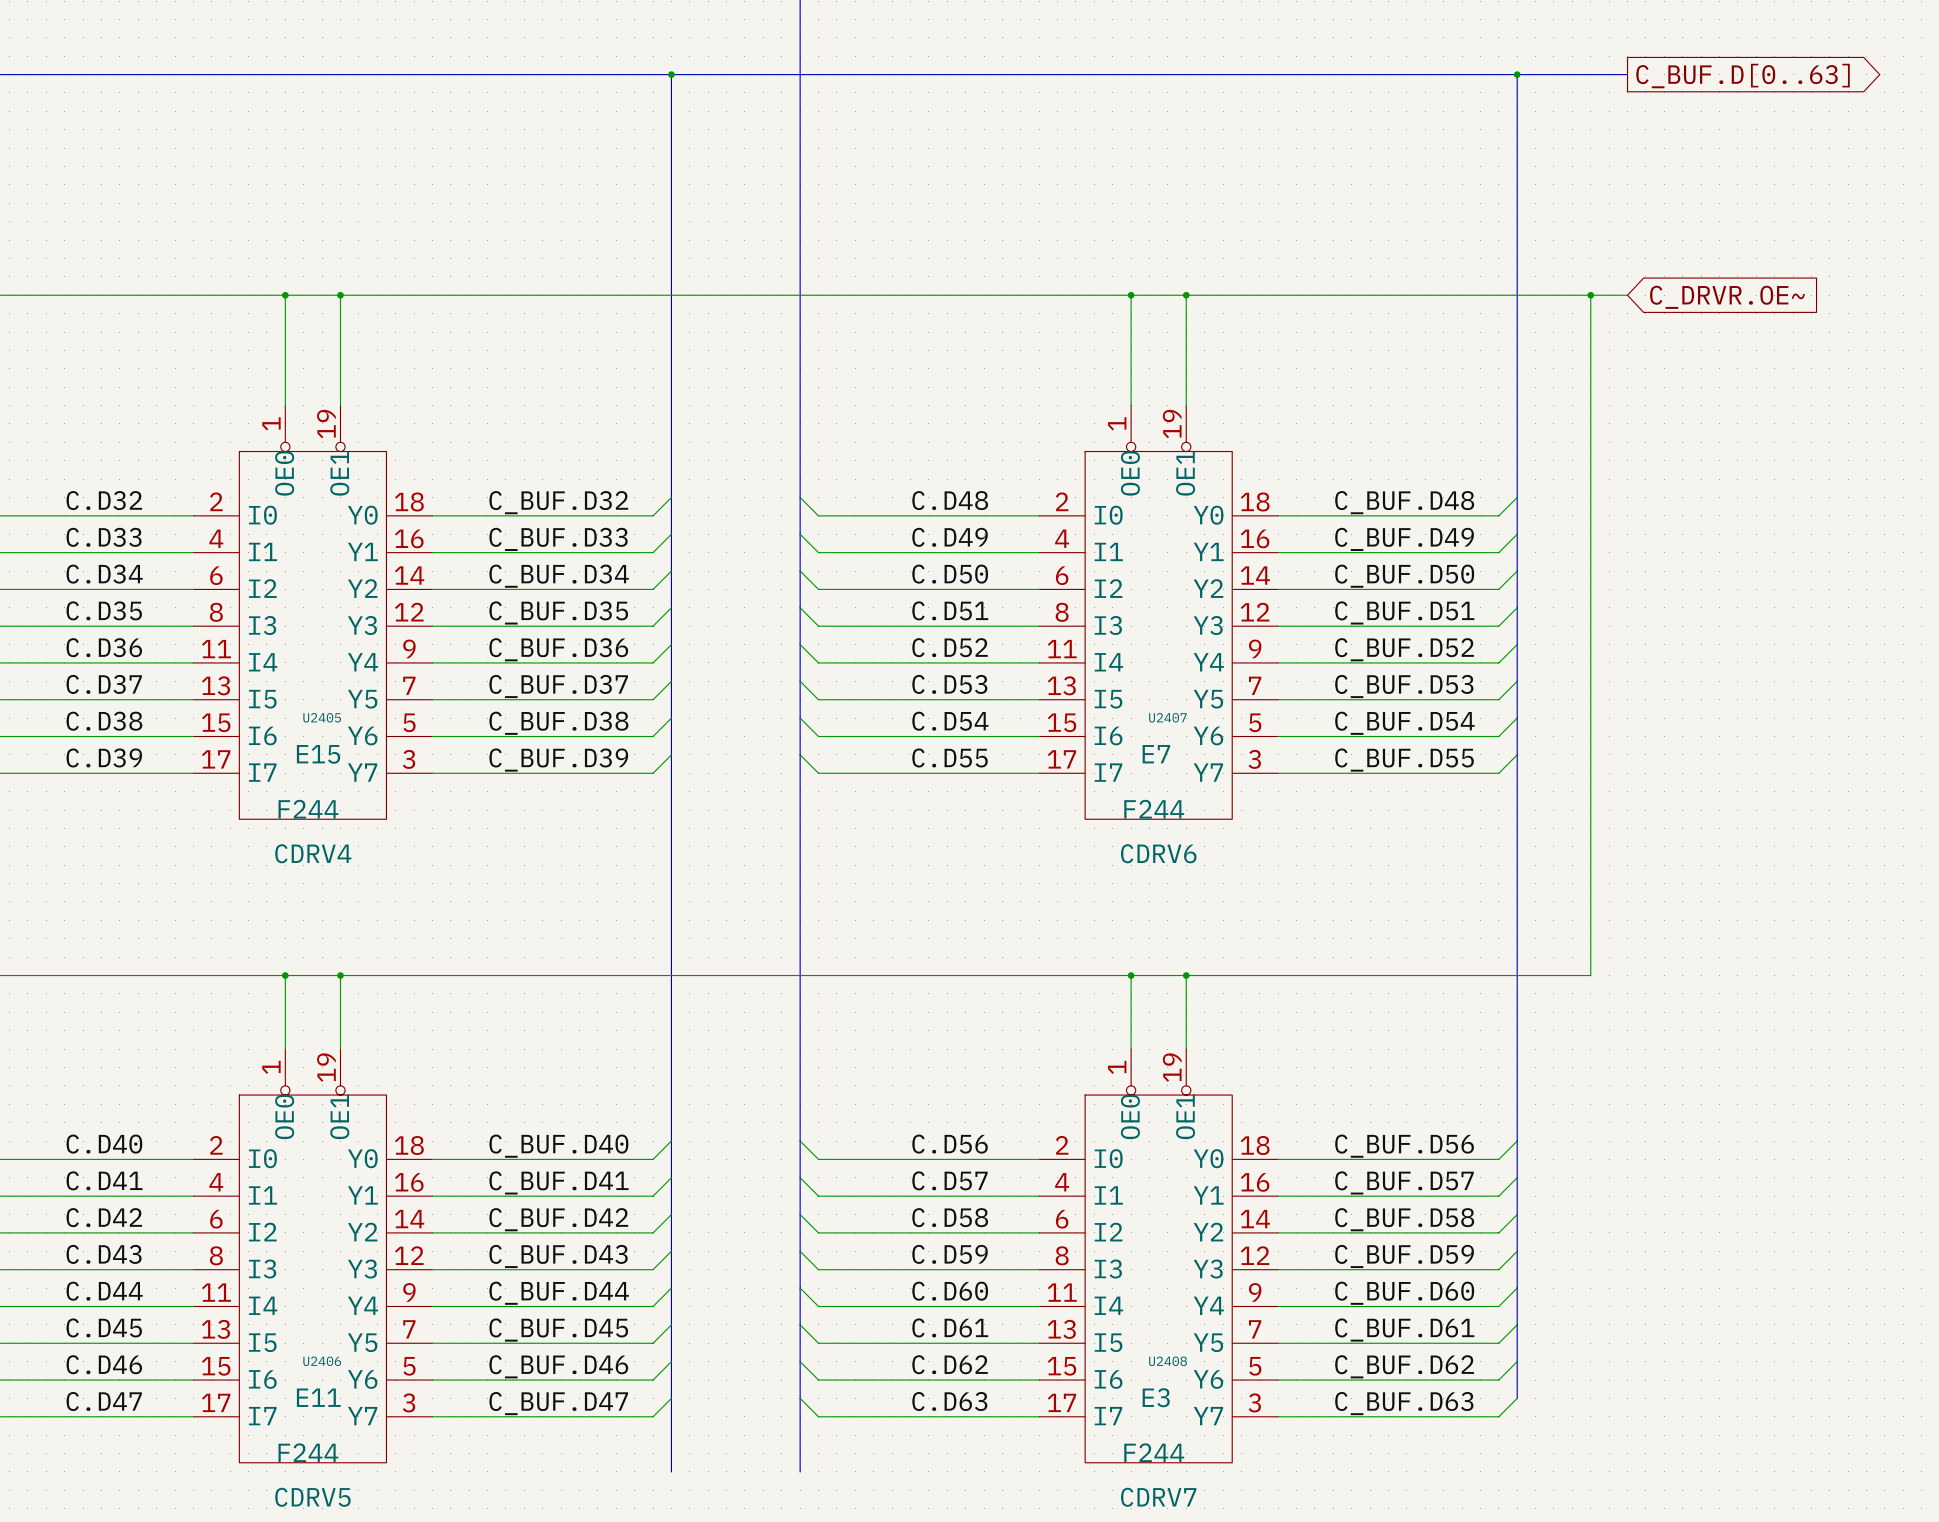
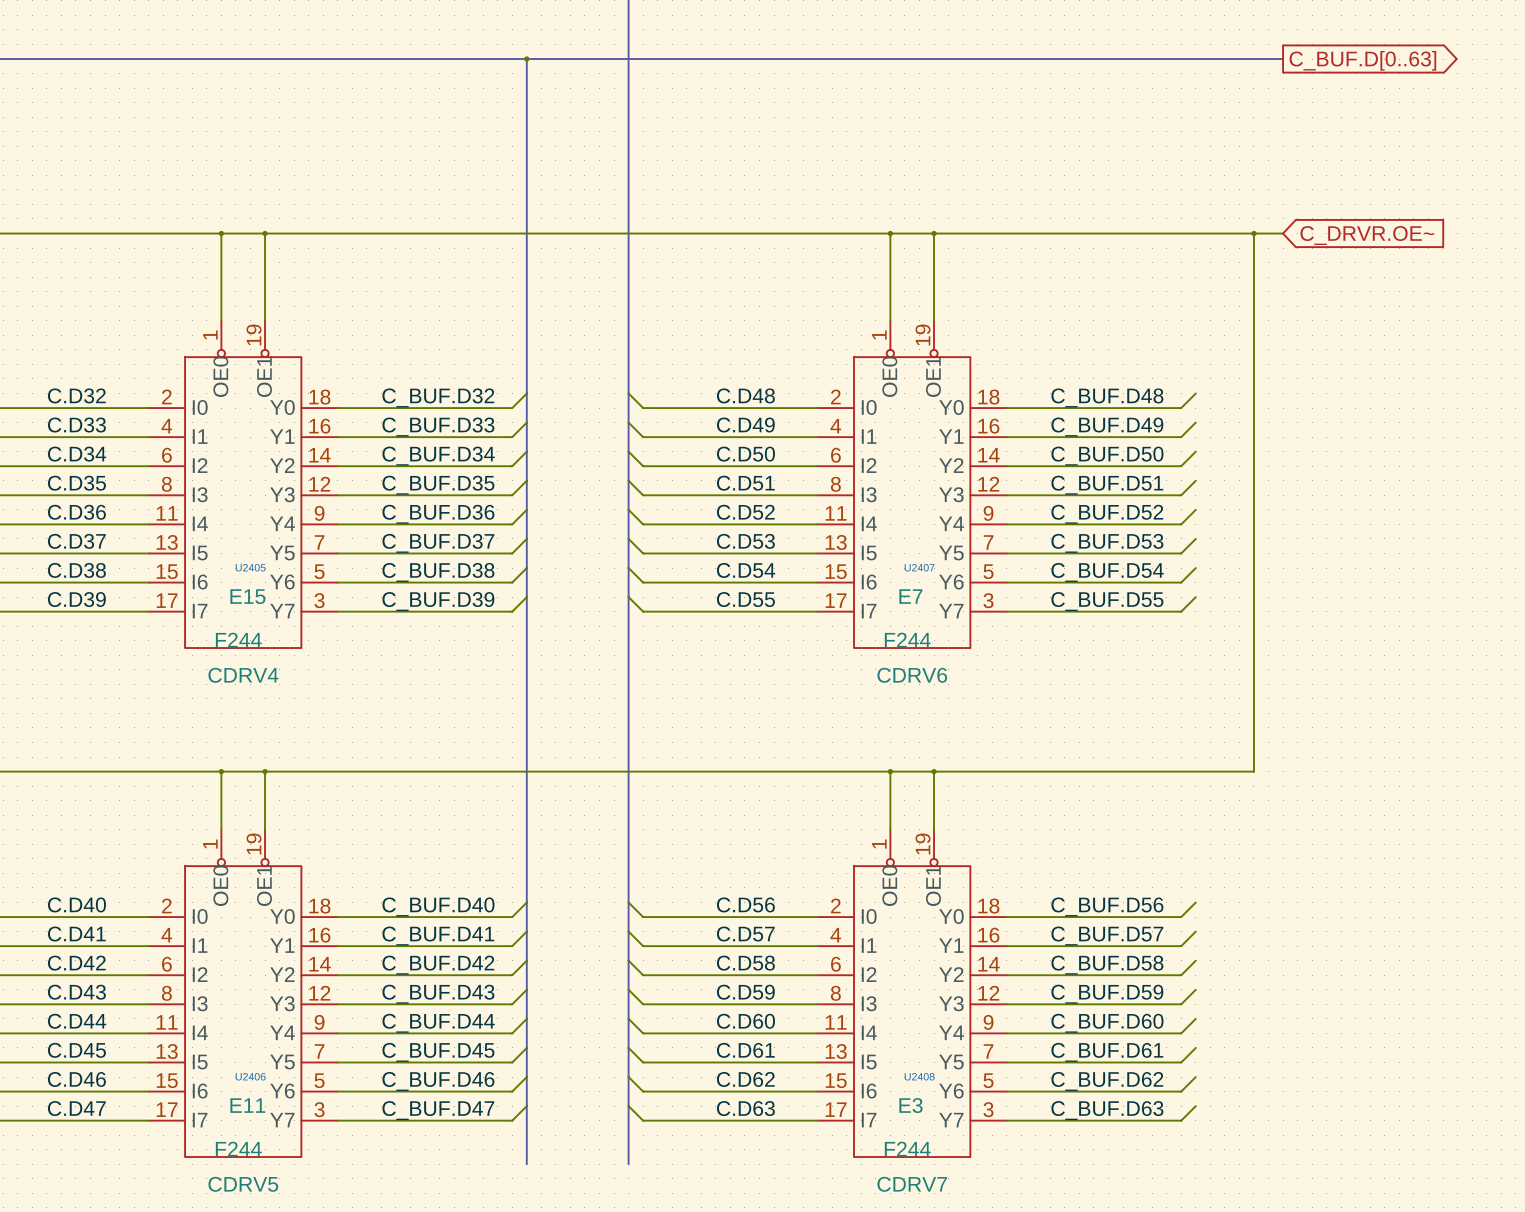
bus: (1517, 74) (1517, 1398) -> none
junction: (1517, 74) -> none

